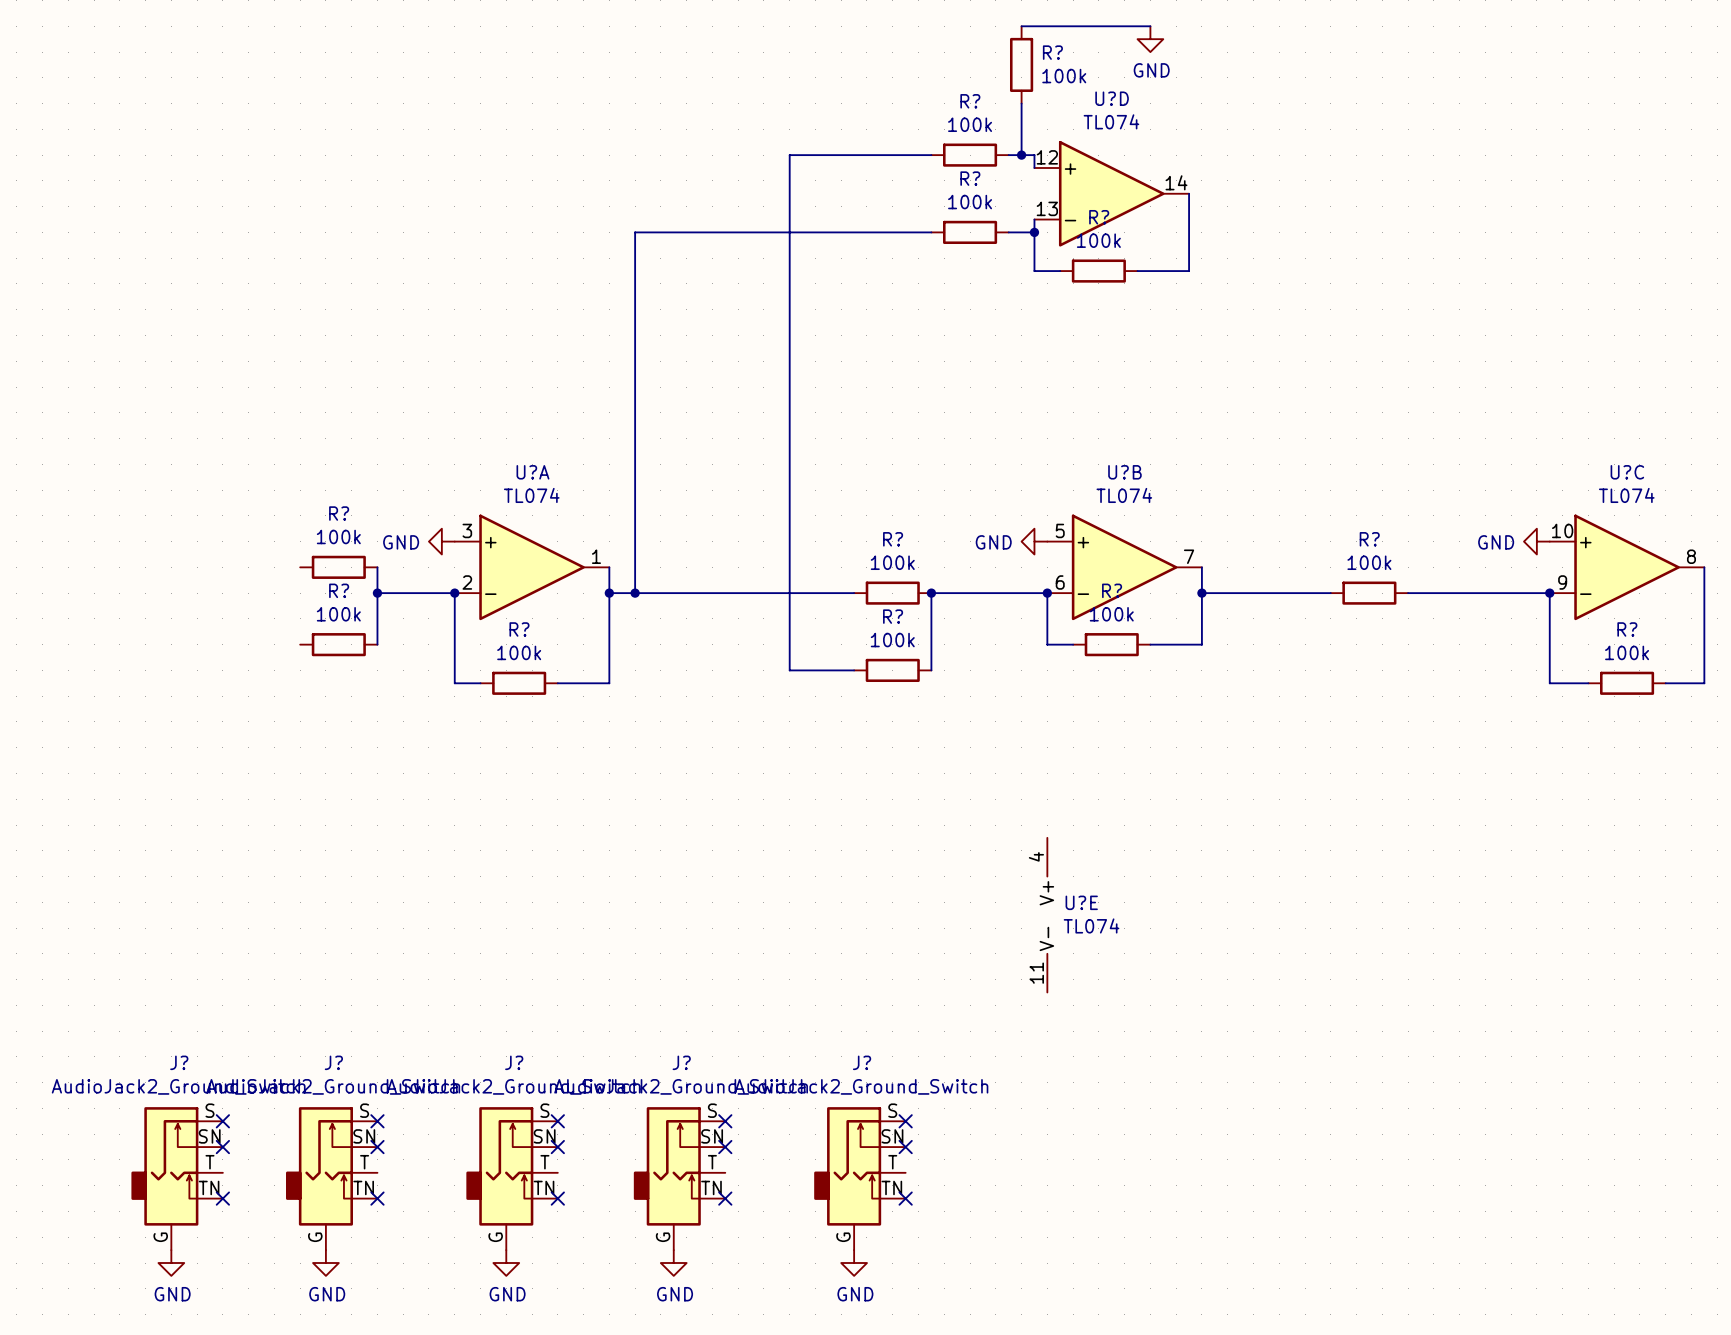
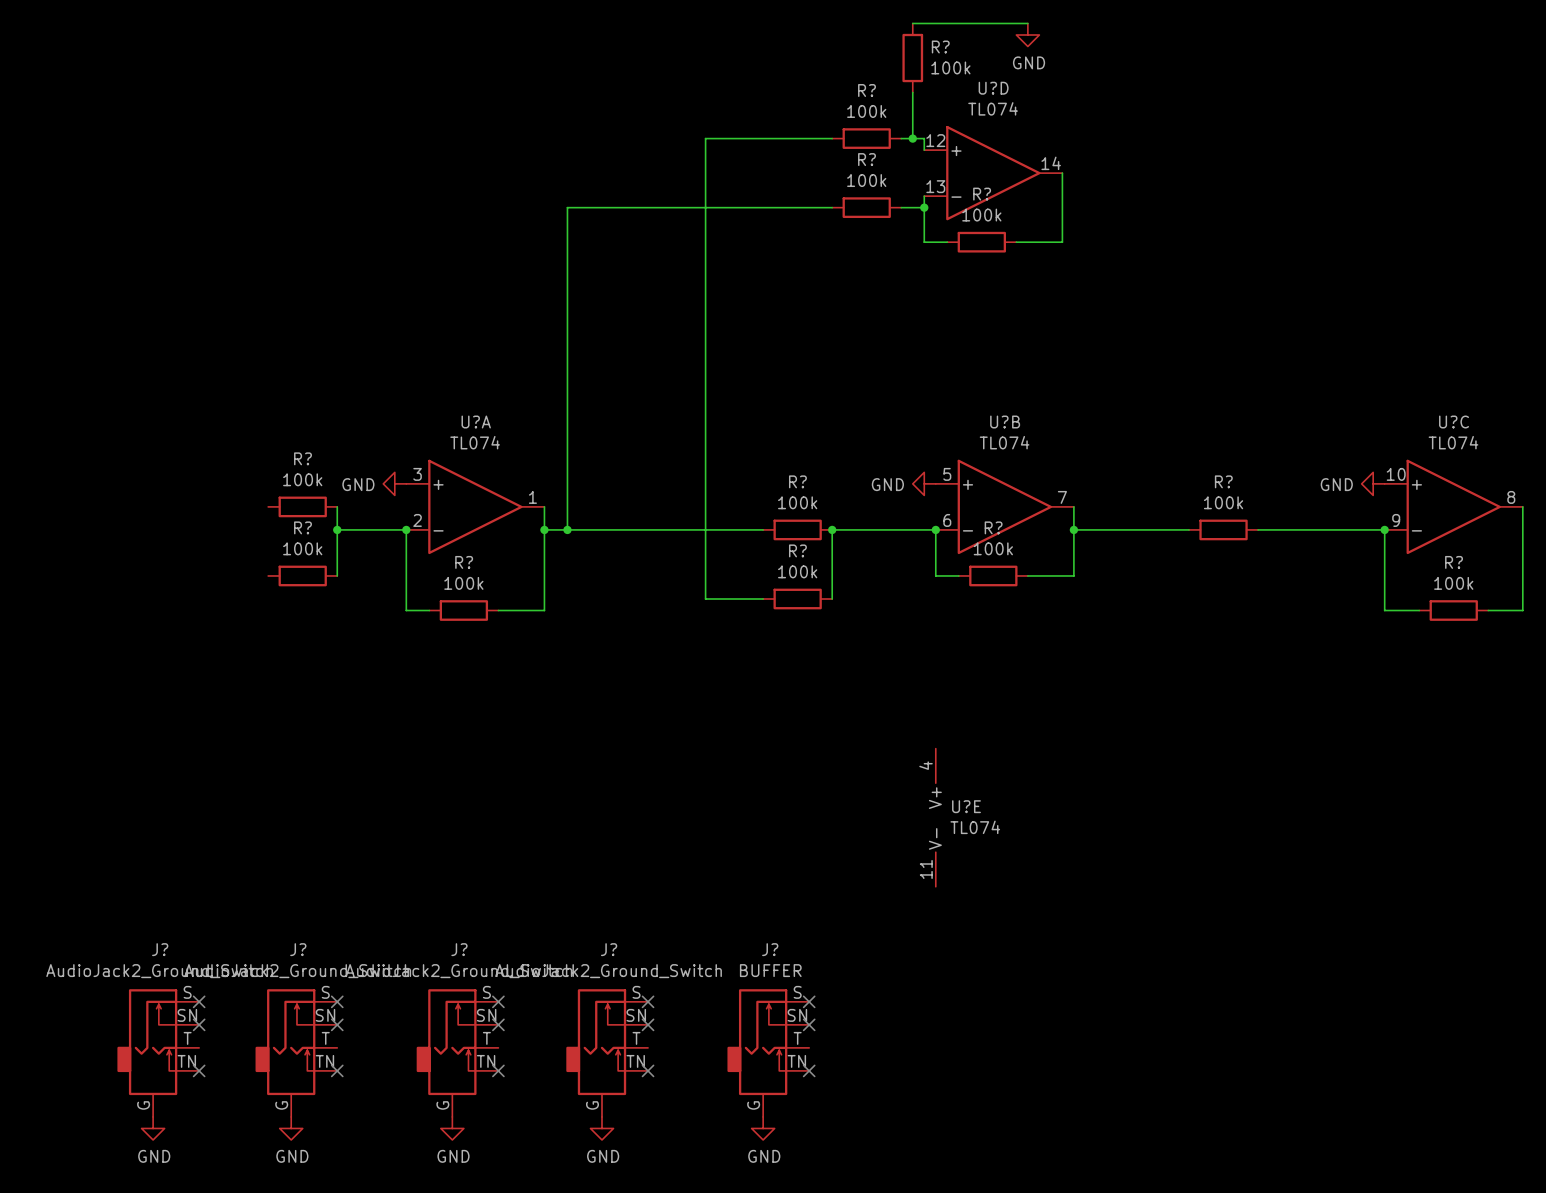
J? value: AudioJack2_Ground_Switch (861, 1086) -> BUFFER (770, 970)

